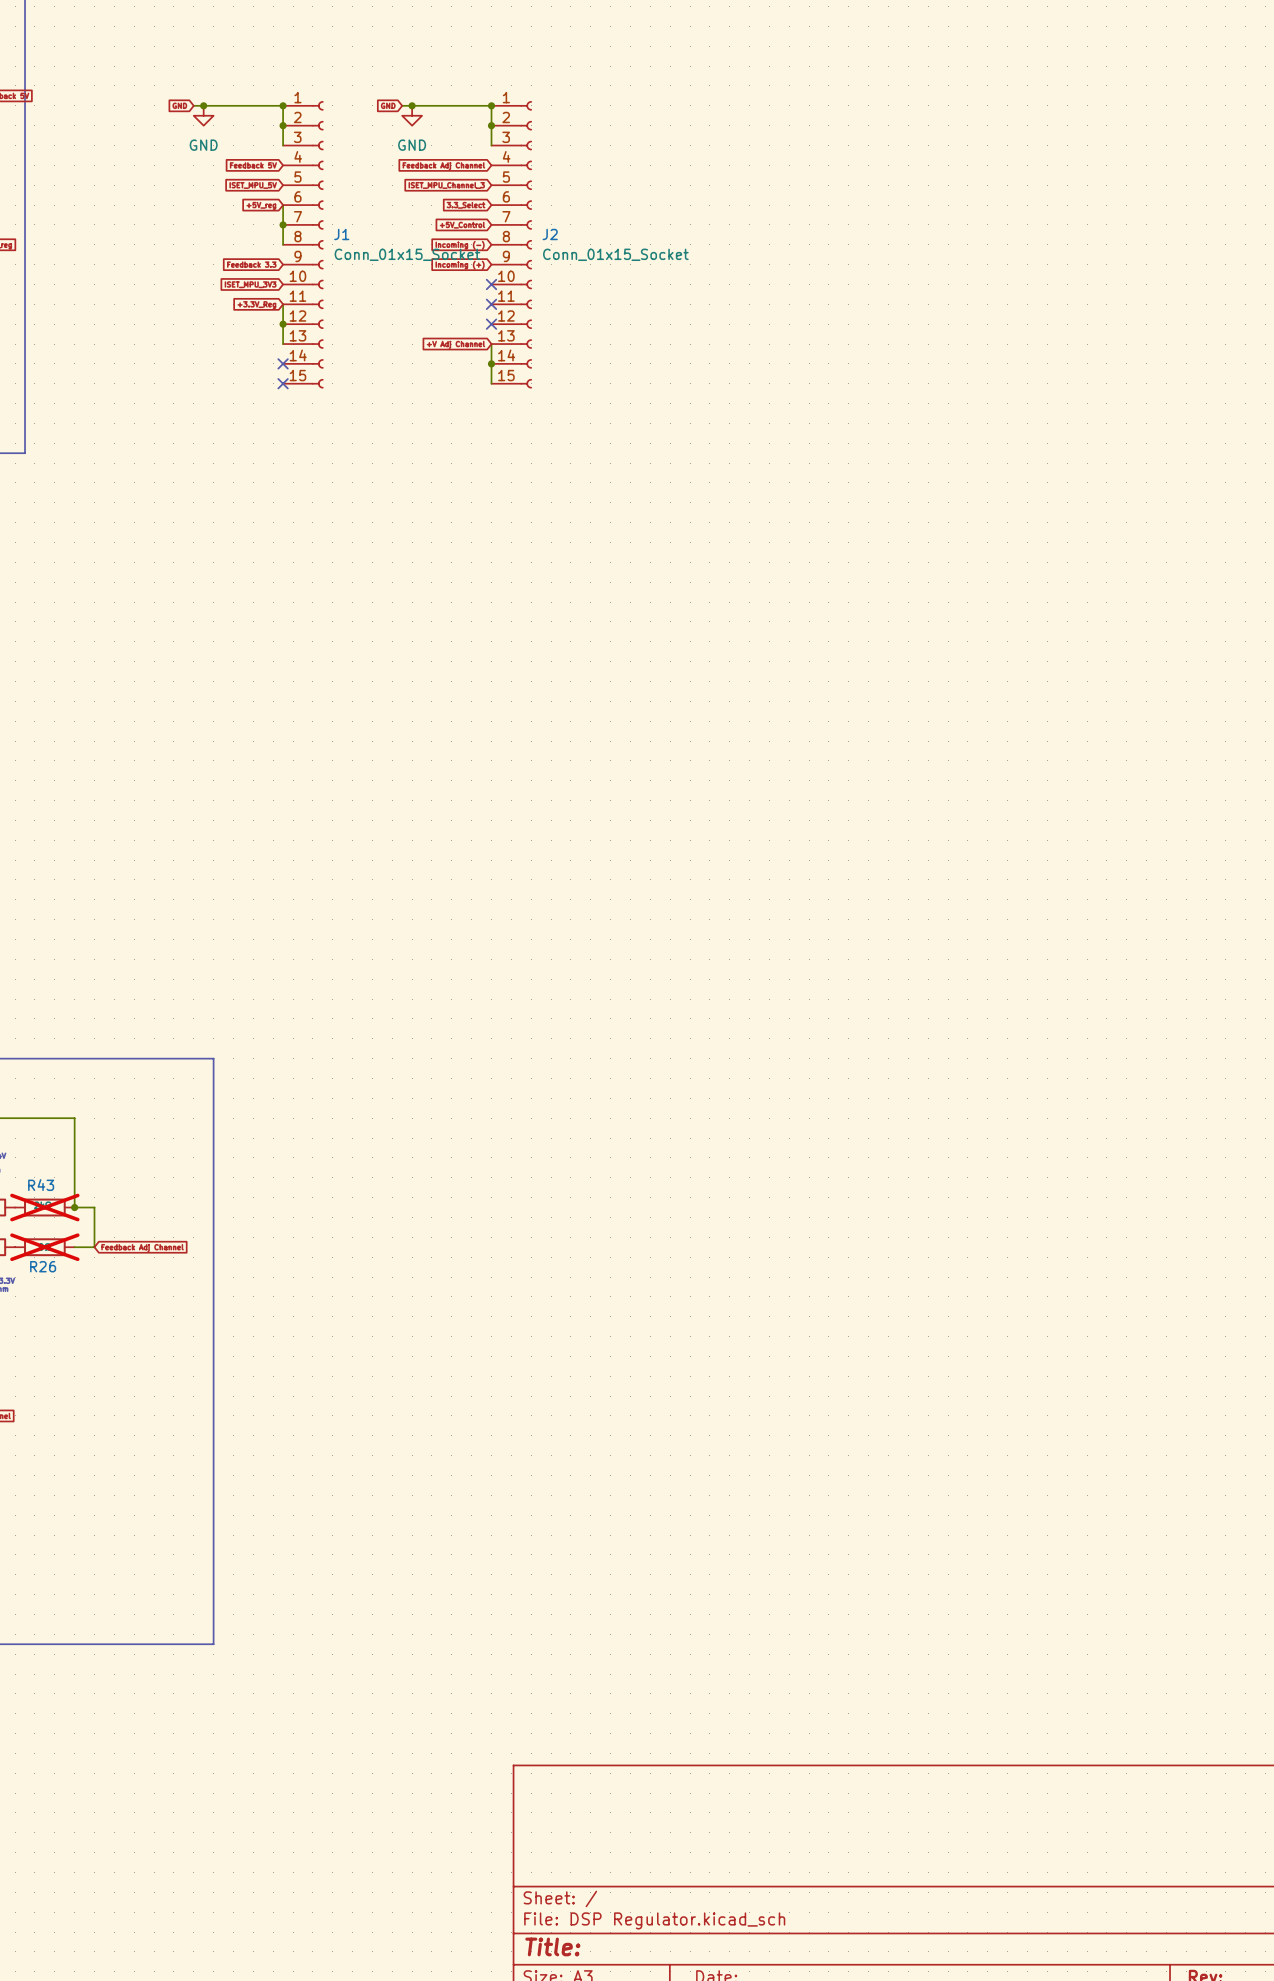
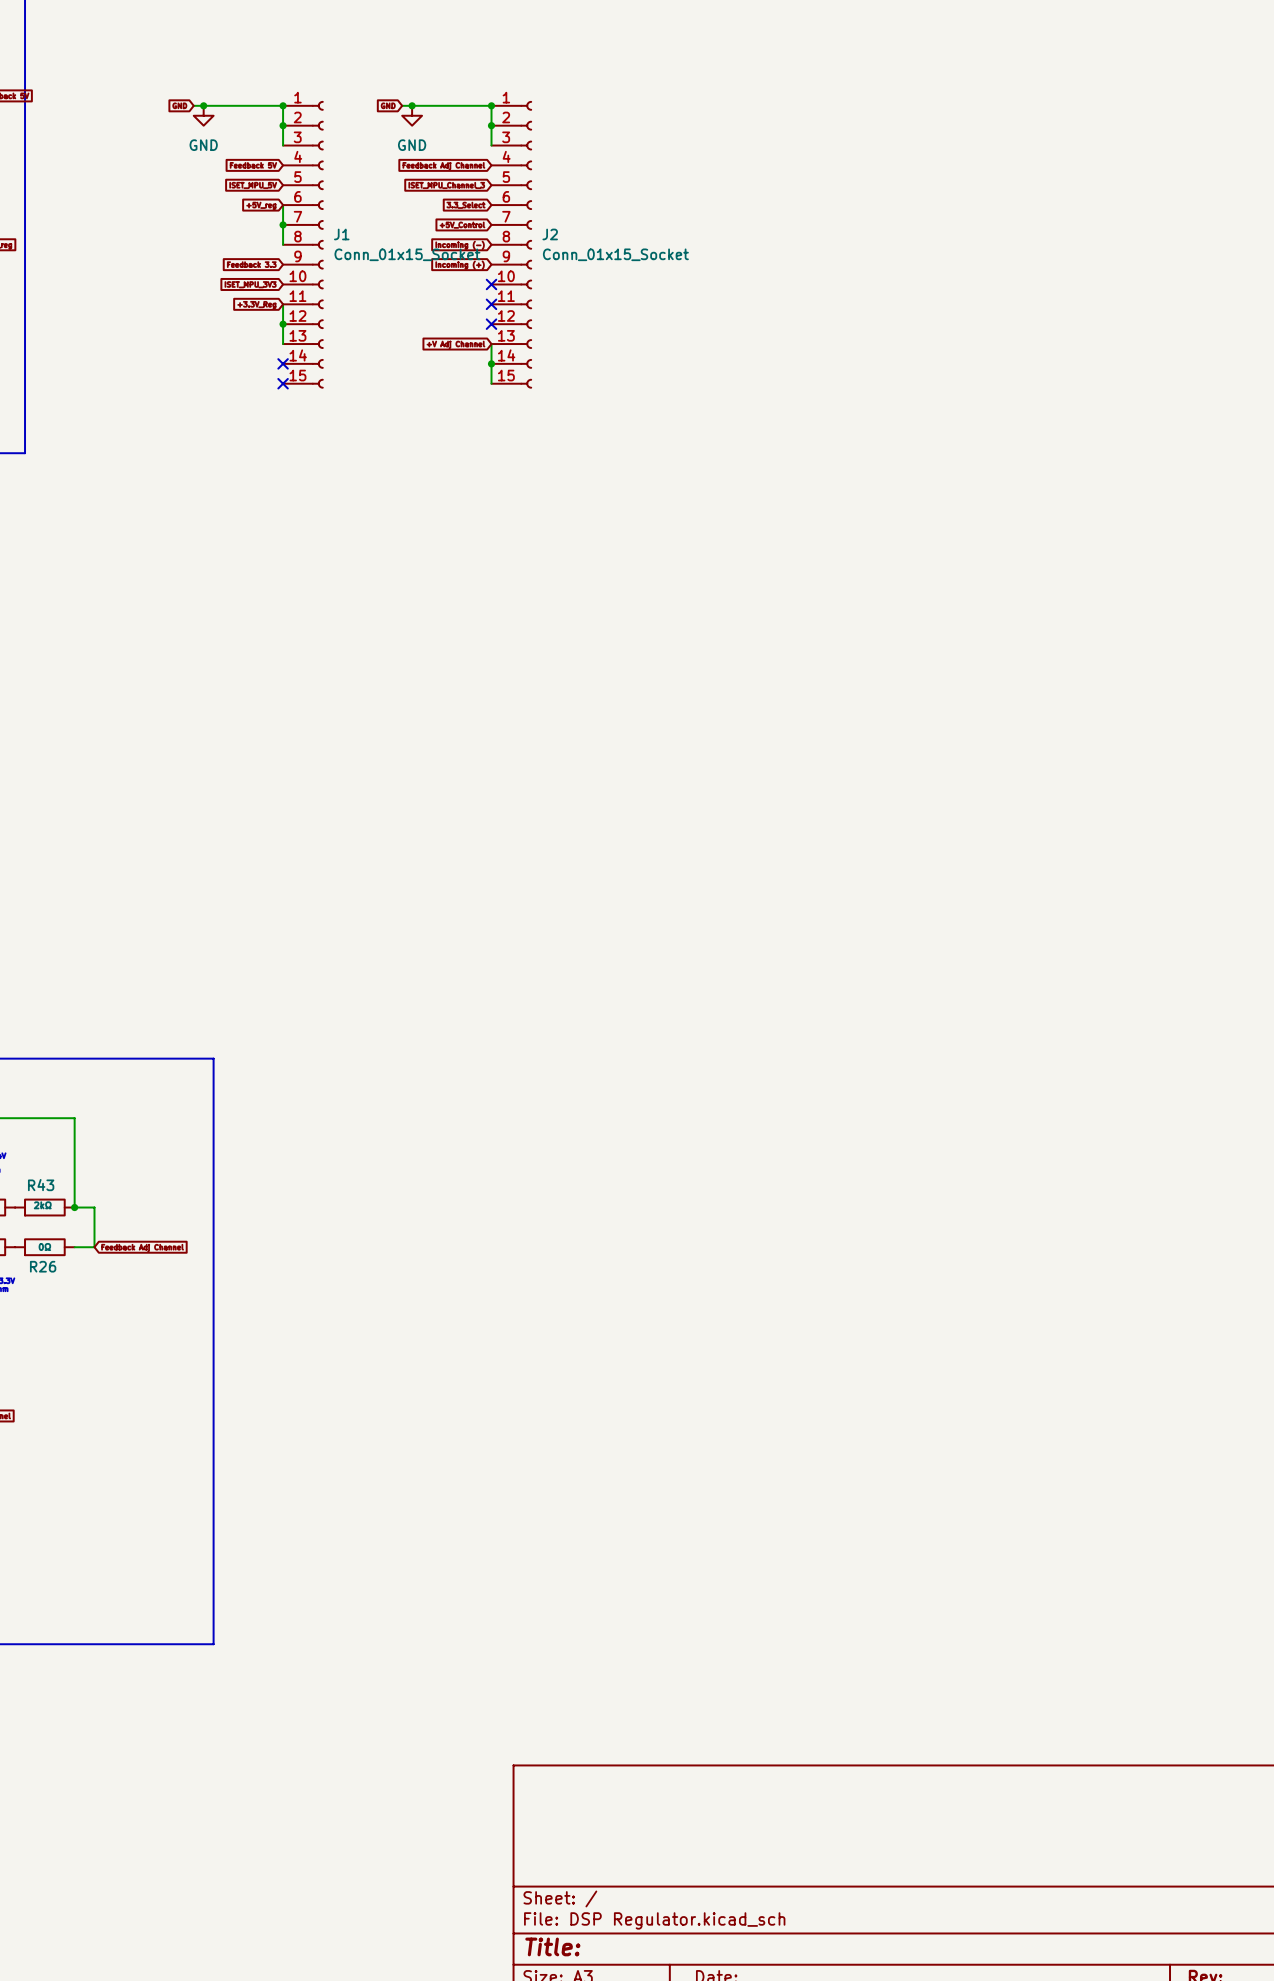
R43 do-not-place cross: (44, 1207) -> none
R26 do-not-place cross: (44, 1247) -> none

